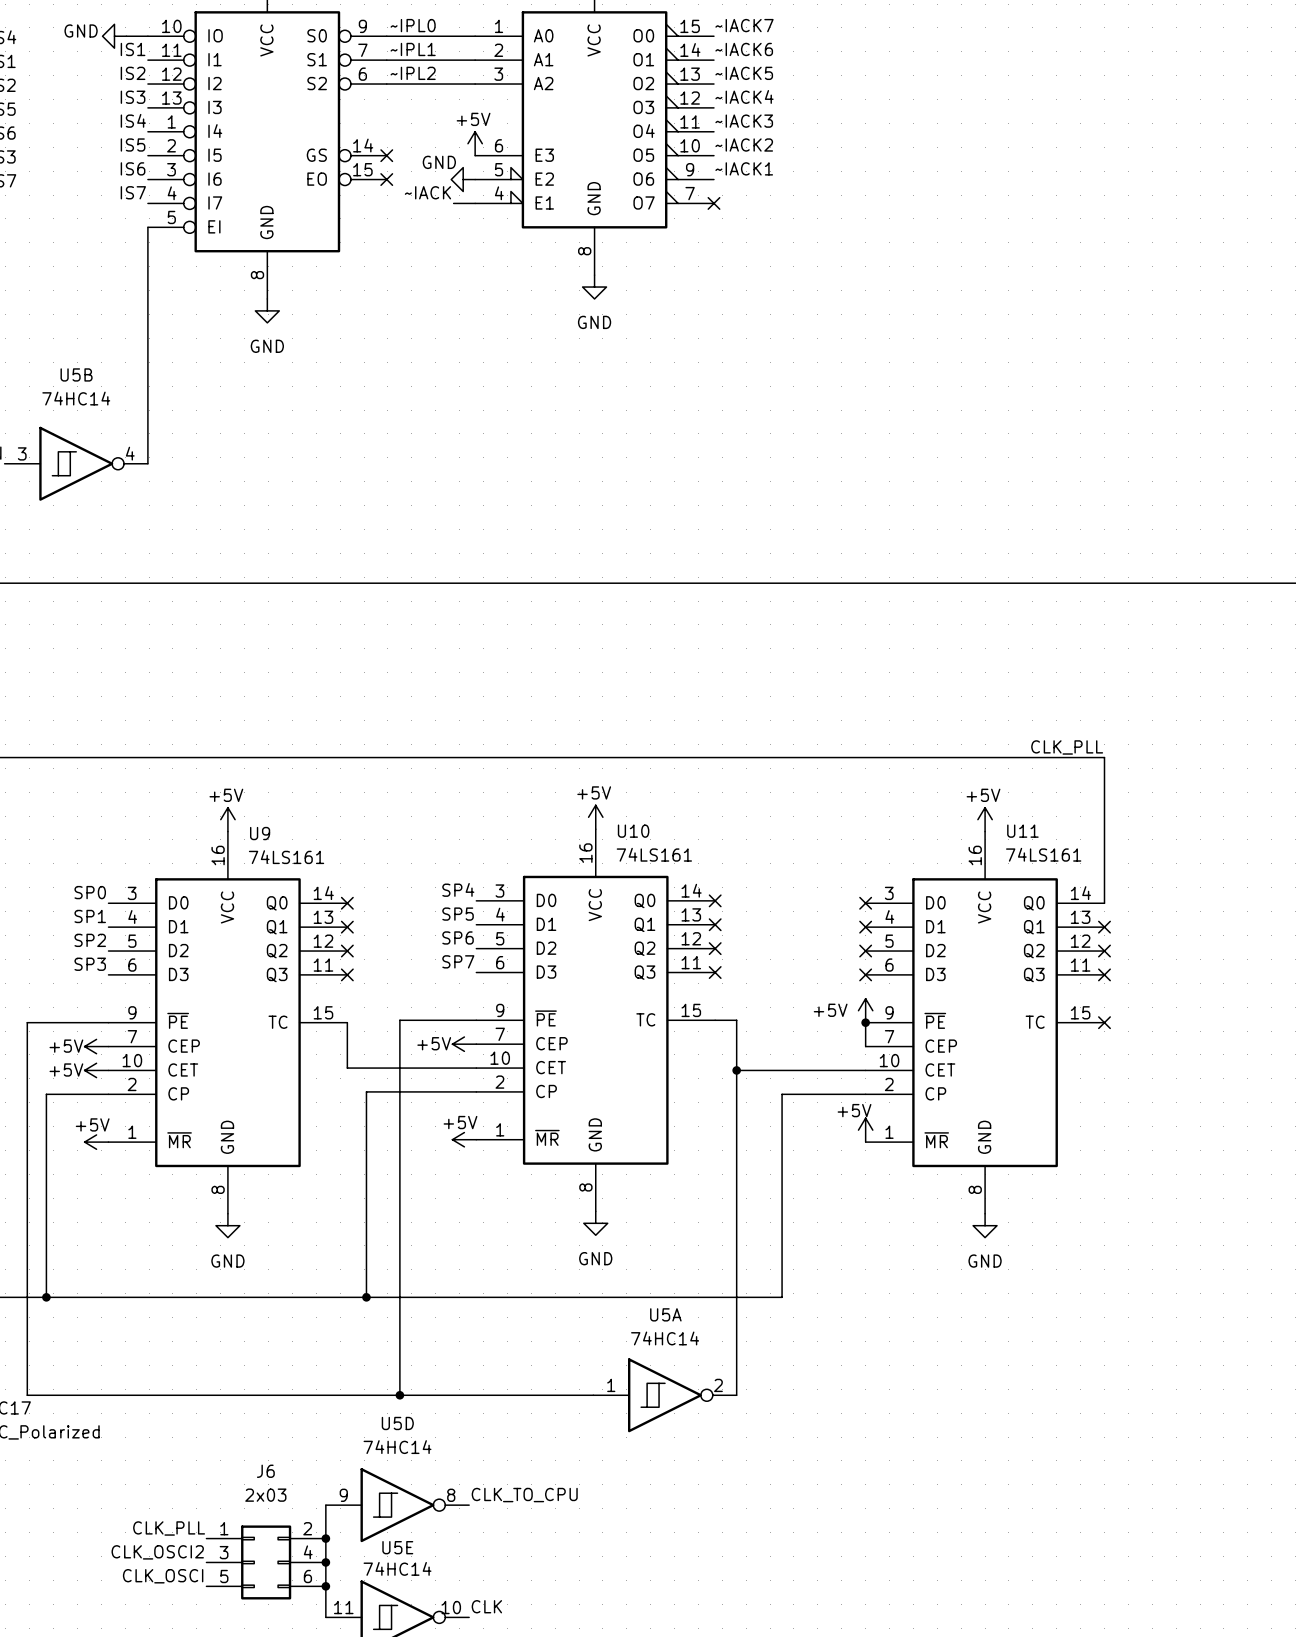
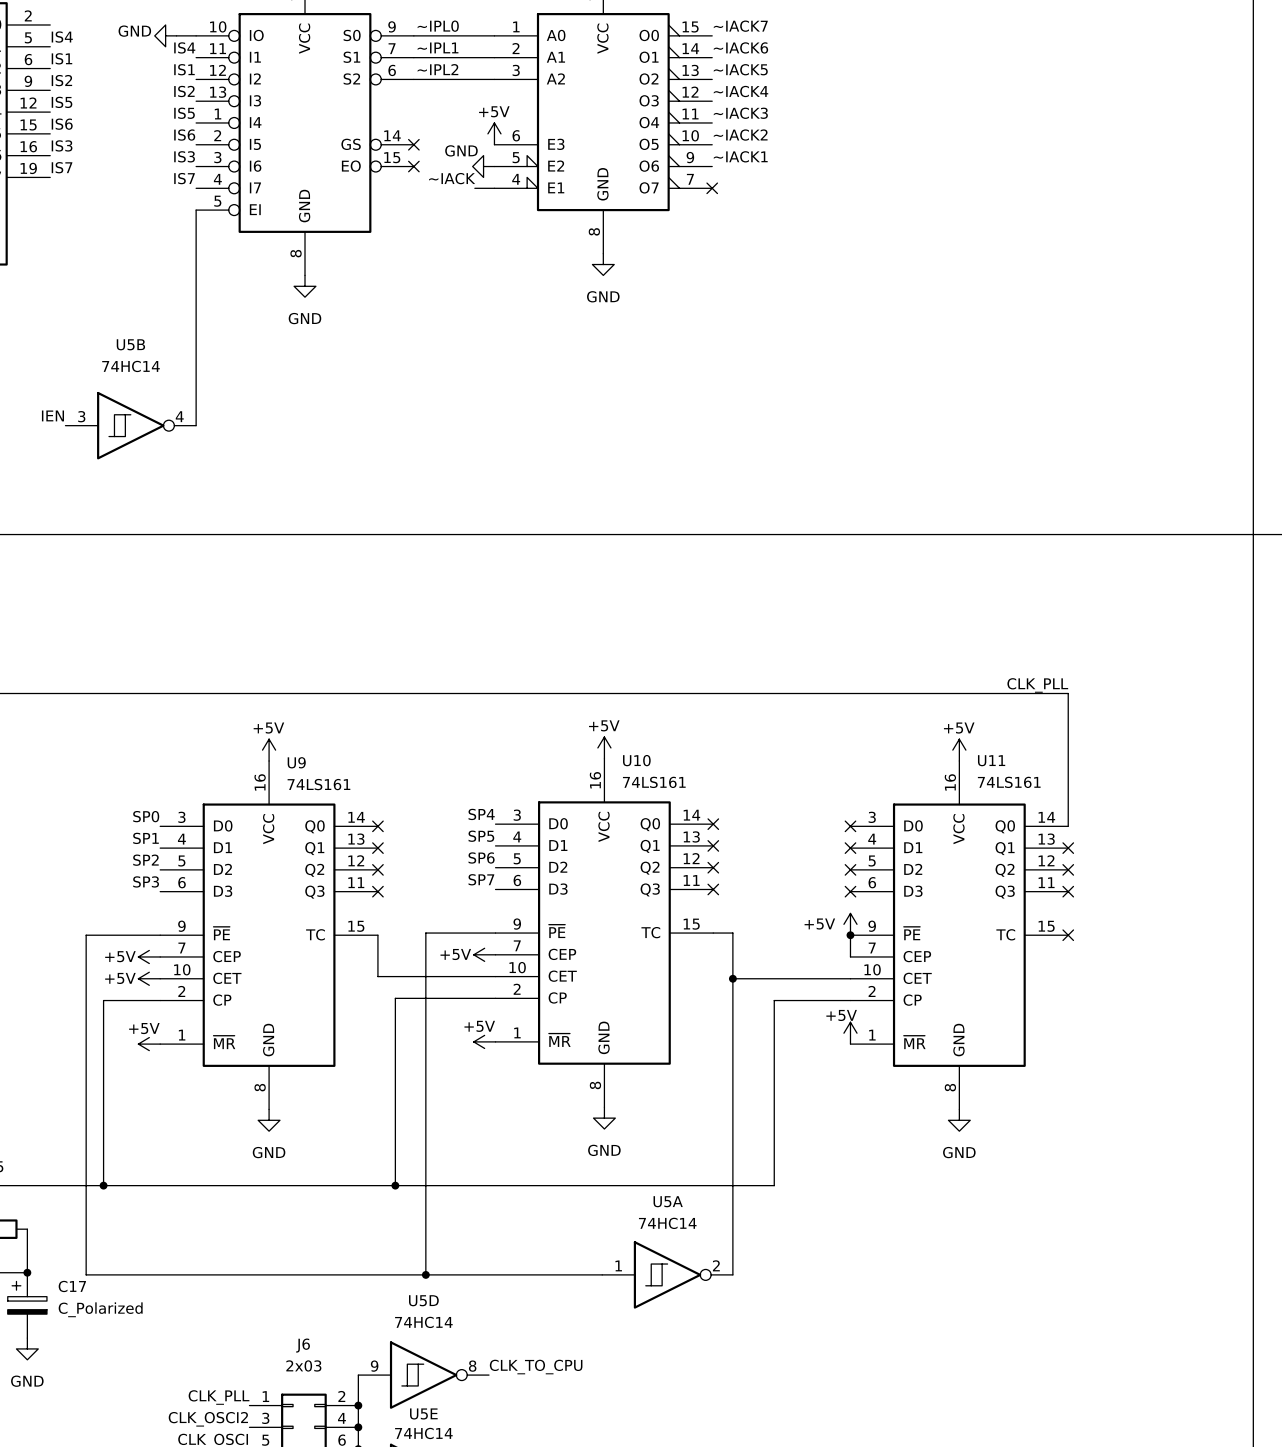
label: IS1 (133, 49) -> IS4 (184, 47)
label: IS2 (133, 73) -> IS1 (184, 69)
label: IS3 (133, 97) -> IS2 (184, 91)
label: IS4 (133, 120) -> IS5 (184, 113)
label: IS5 (133, 145) -> IS6 (184, 135)
label: IS6 (133, 168) -> IS3 (184, 156)

